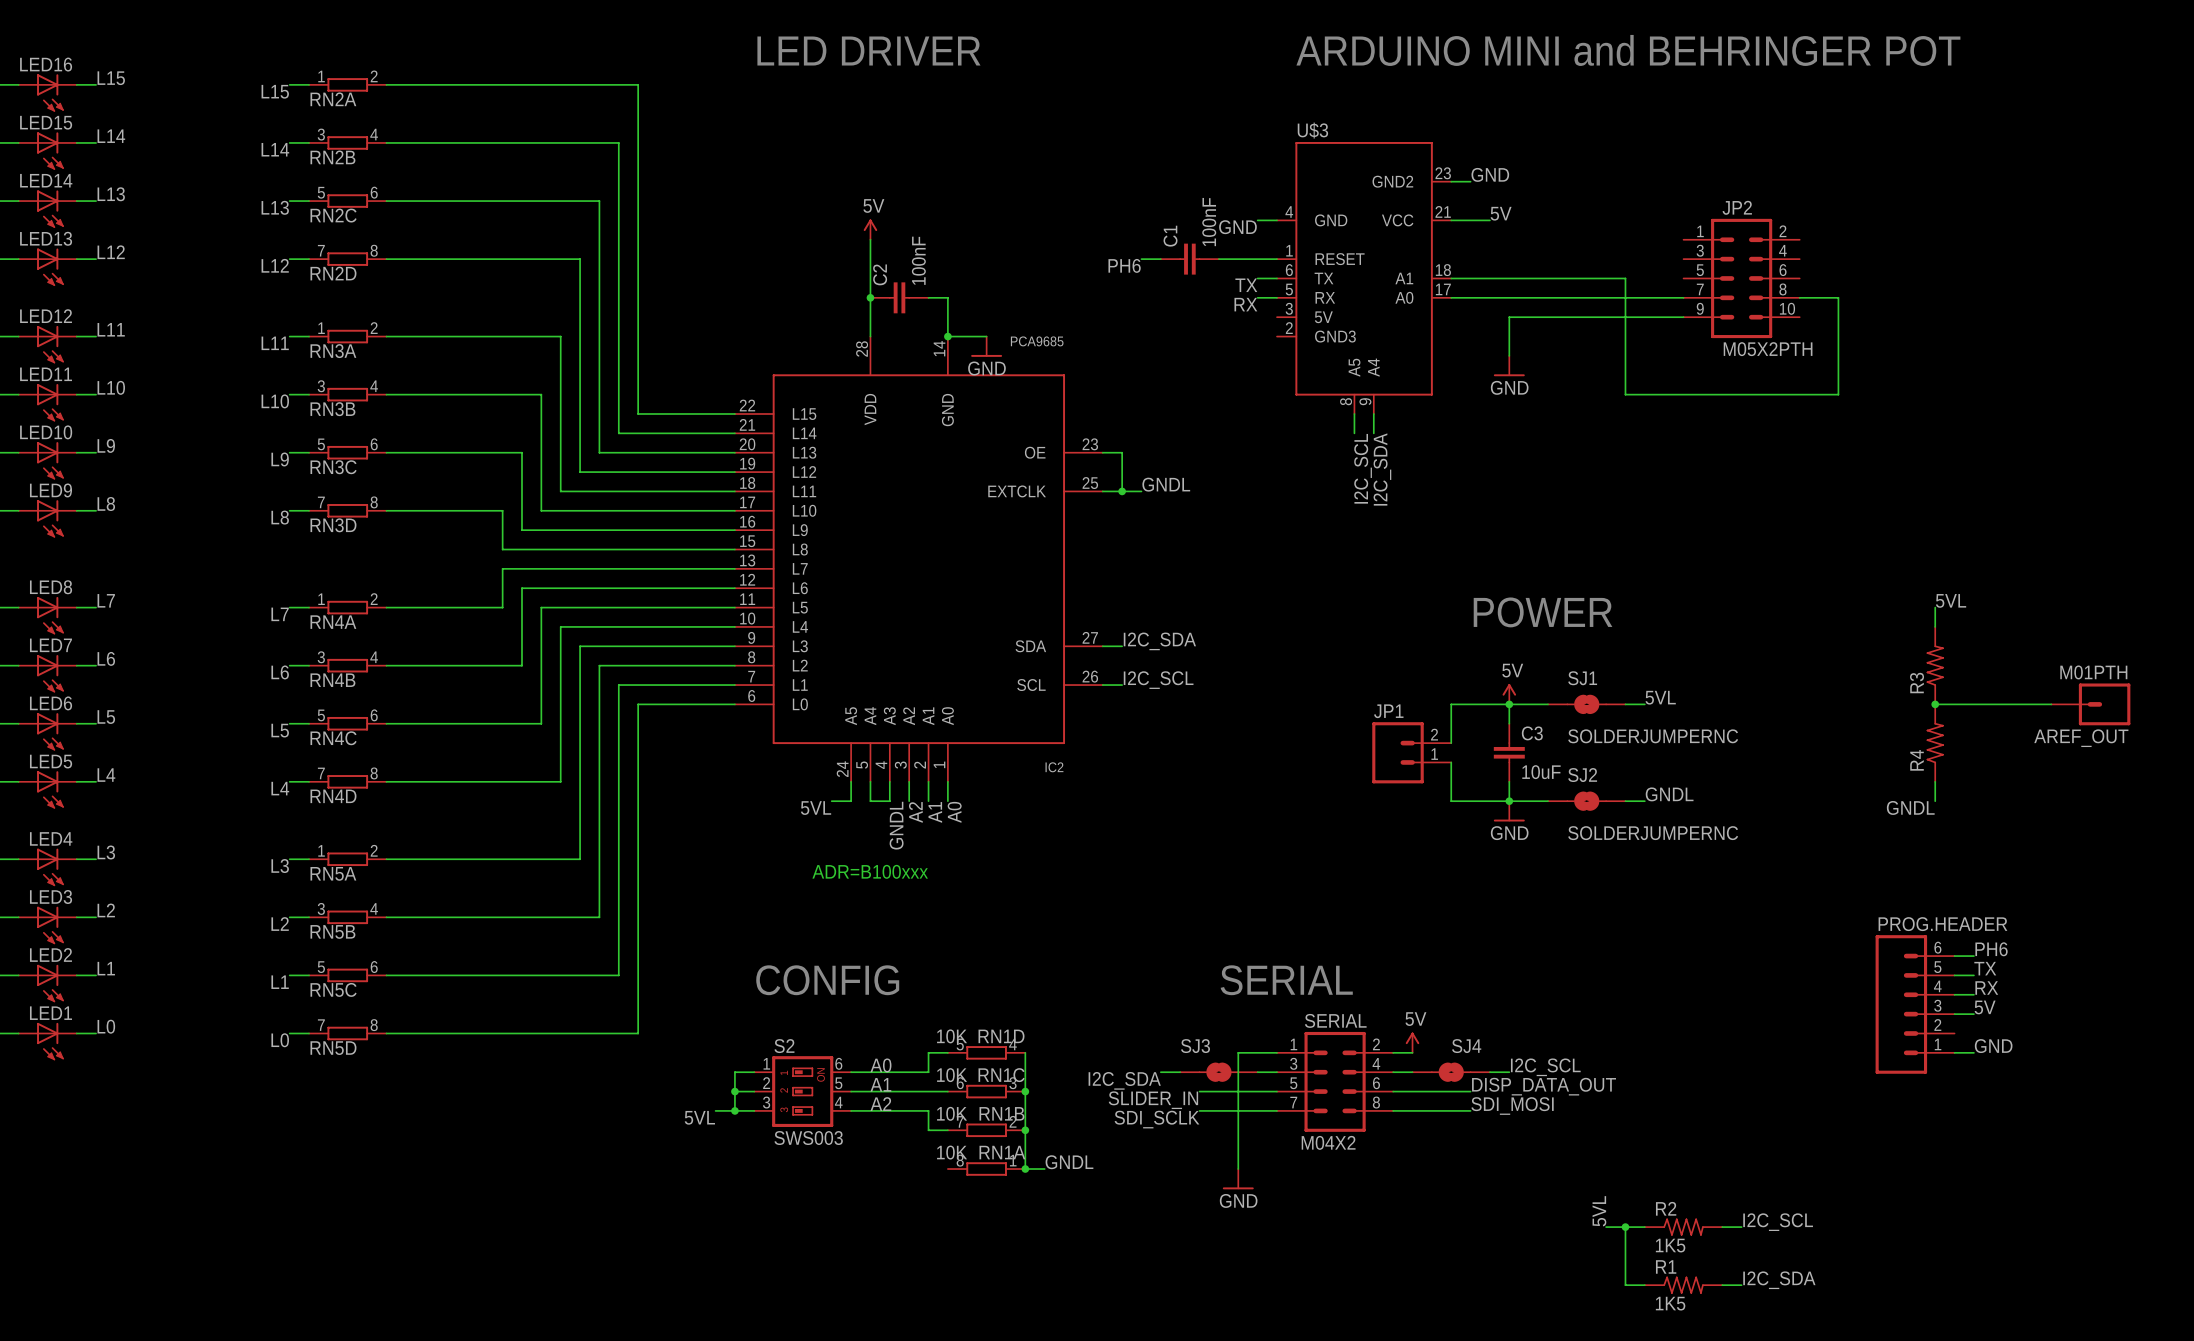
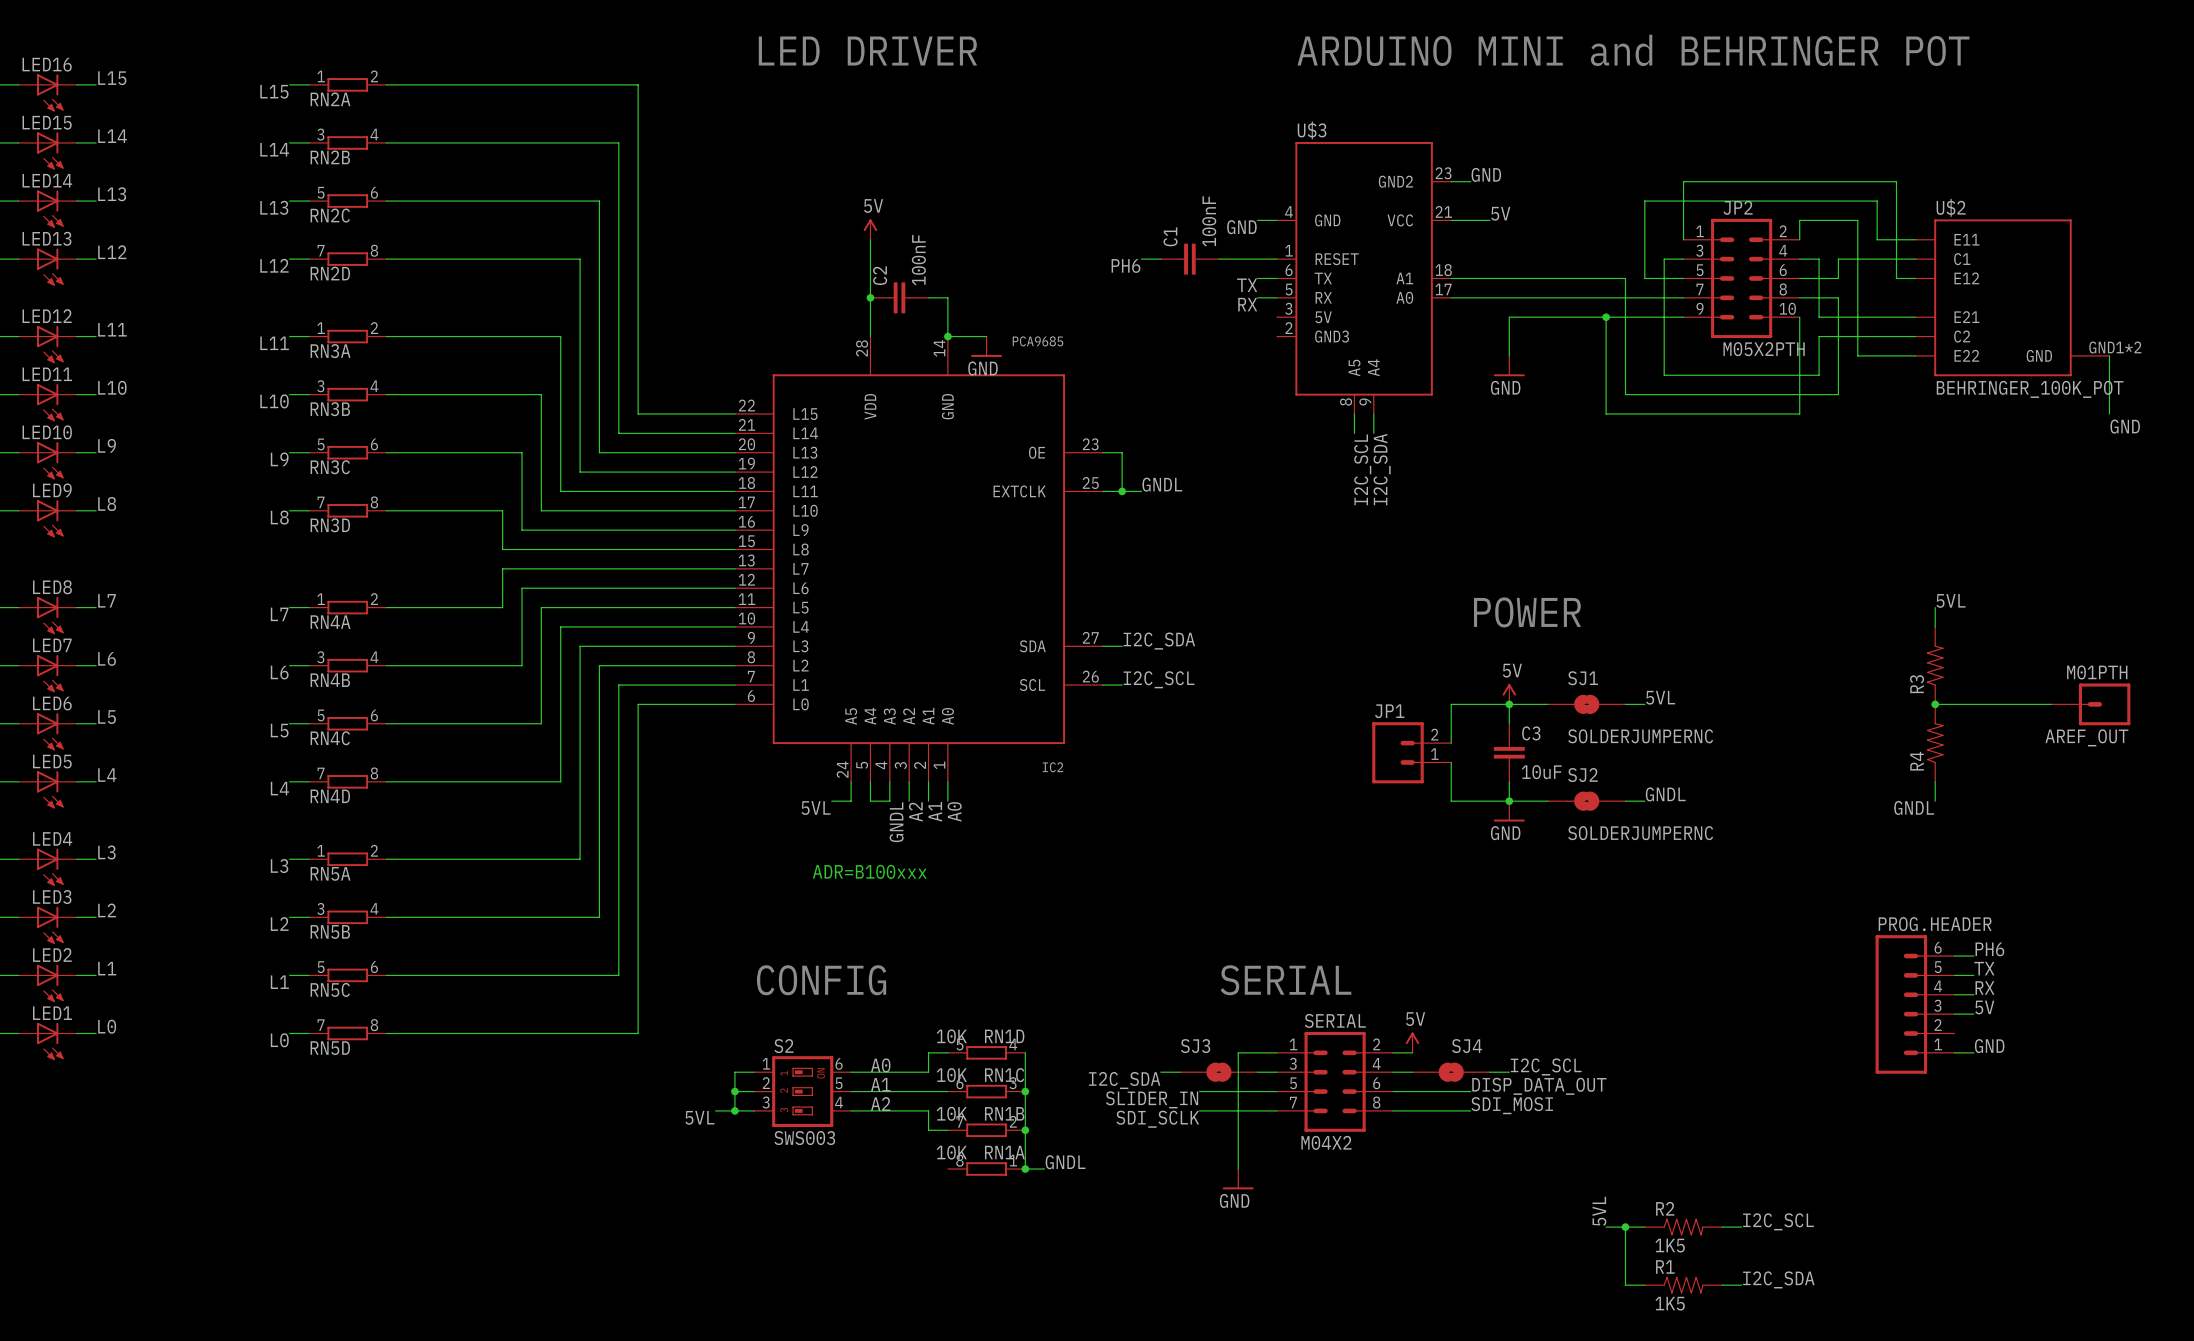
wire: none -> (1683, 239) (1683, 181) (1896, 181) (1896, 278) (1915, 278)
wire: none -> (1799, 239) (1799, 220) (1857, 220) (1857, 355) (1915, 355)
wire: none -> (1915, 239) (1877, 239) (1877, 201) (1644, 201) (1644, 278) (1683, 278)
wire: none -> (1683, 259) (1664, 259) (1664, 375) (1819, 375) (1819, 336) (1915, 336)
wire: none -> (1799, 259) (1819, 259) (1819, 317) (1915, 317)
wire: none -> (1915, 259) (1838, 259) (1838, 278) (1799, 278)
U$2: none -> BEHRINGER_100K_POT (2012, 297)
wire: none -> (1606, 317) (1606, 413) (1799, 413) (1799, 317)
junction: none -> (1606, 317)
wire: none -> (2109, 355) (2109, 413)
label: none -> GND (2125, 426)

